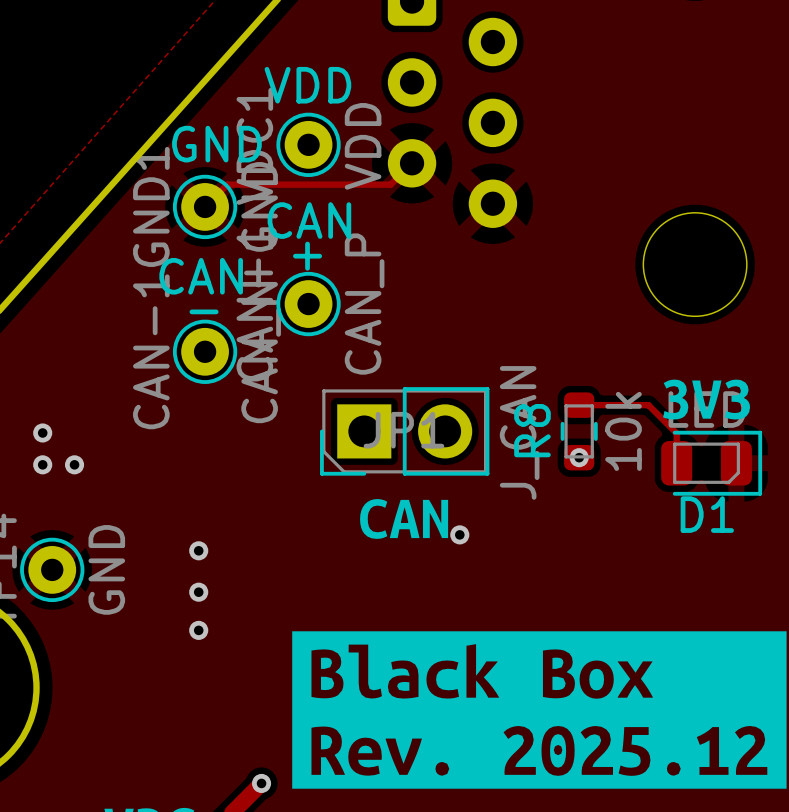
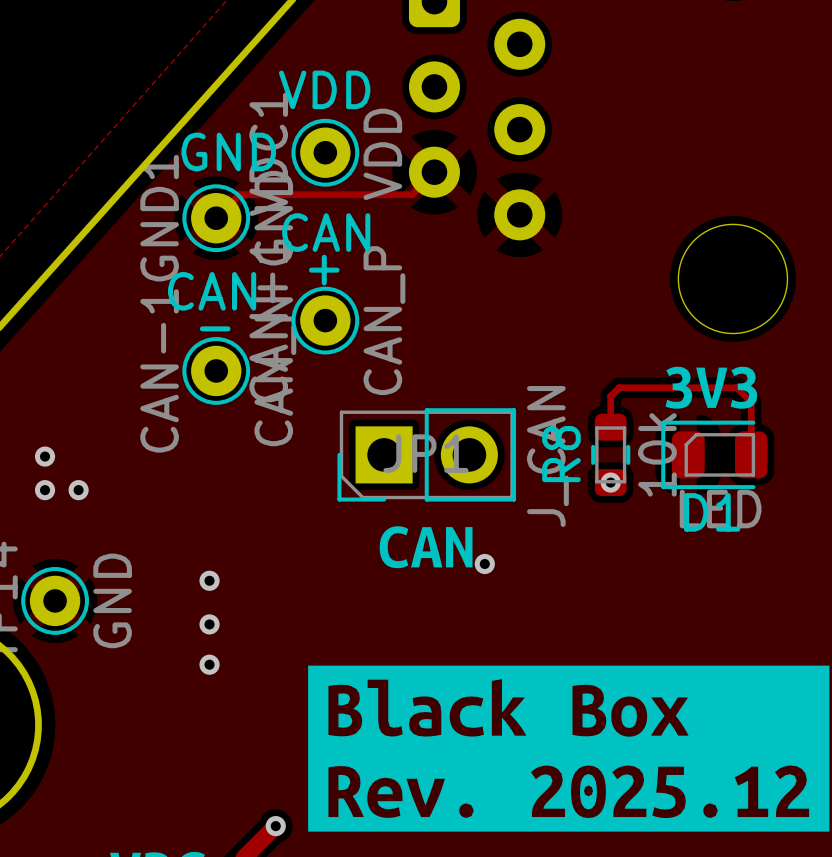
drawing position: (706, 399) -> (711, 387)
track: (579, 405) (648, 405) (676, 433) (676, 463) -> (610, 427) (610, 396) (619, 387) (736, 387) (751, 402) (751, 454)
D1 rotation: 0° (711, 463) -> 180° (714, 454)

